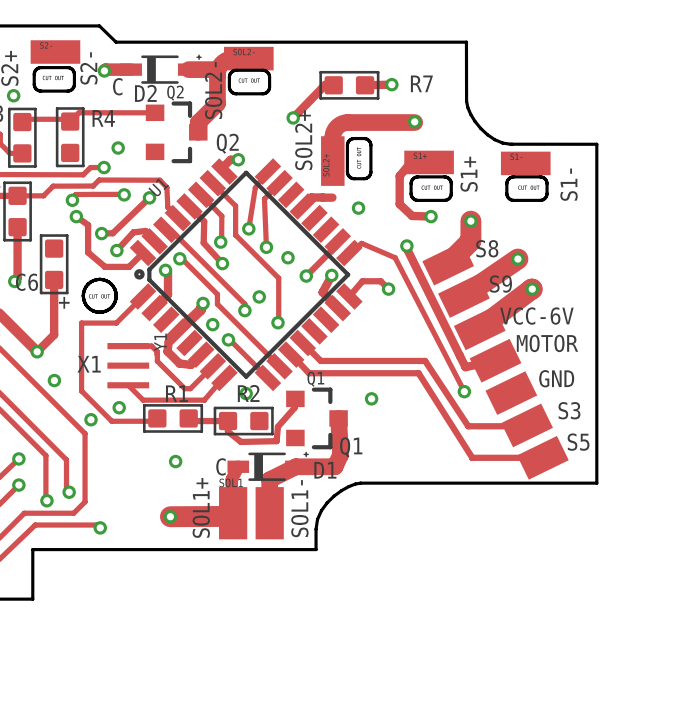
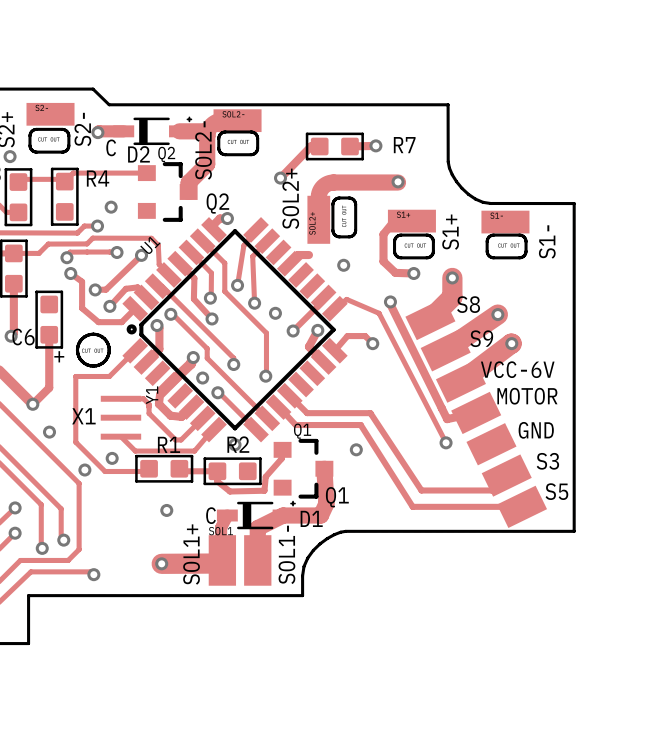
track: (322, 197) (332, 197) -> none
via: (259, 296) -> none
track: (386, 360) (425, 360) (468, 426) (526, 426) -> (370, 413) (421, 490) (491, 490) (505, 476)
track: (376, 373) (418, 373) (472, 457) -> (360, 425) (412, 506) (453, 506)

